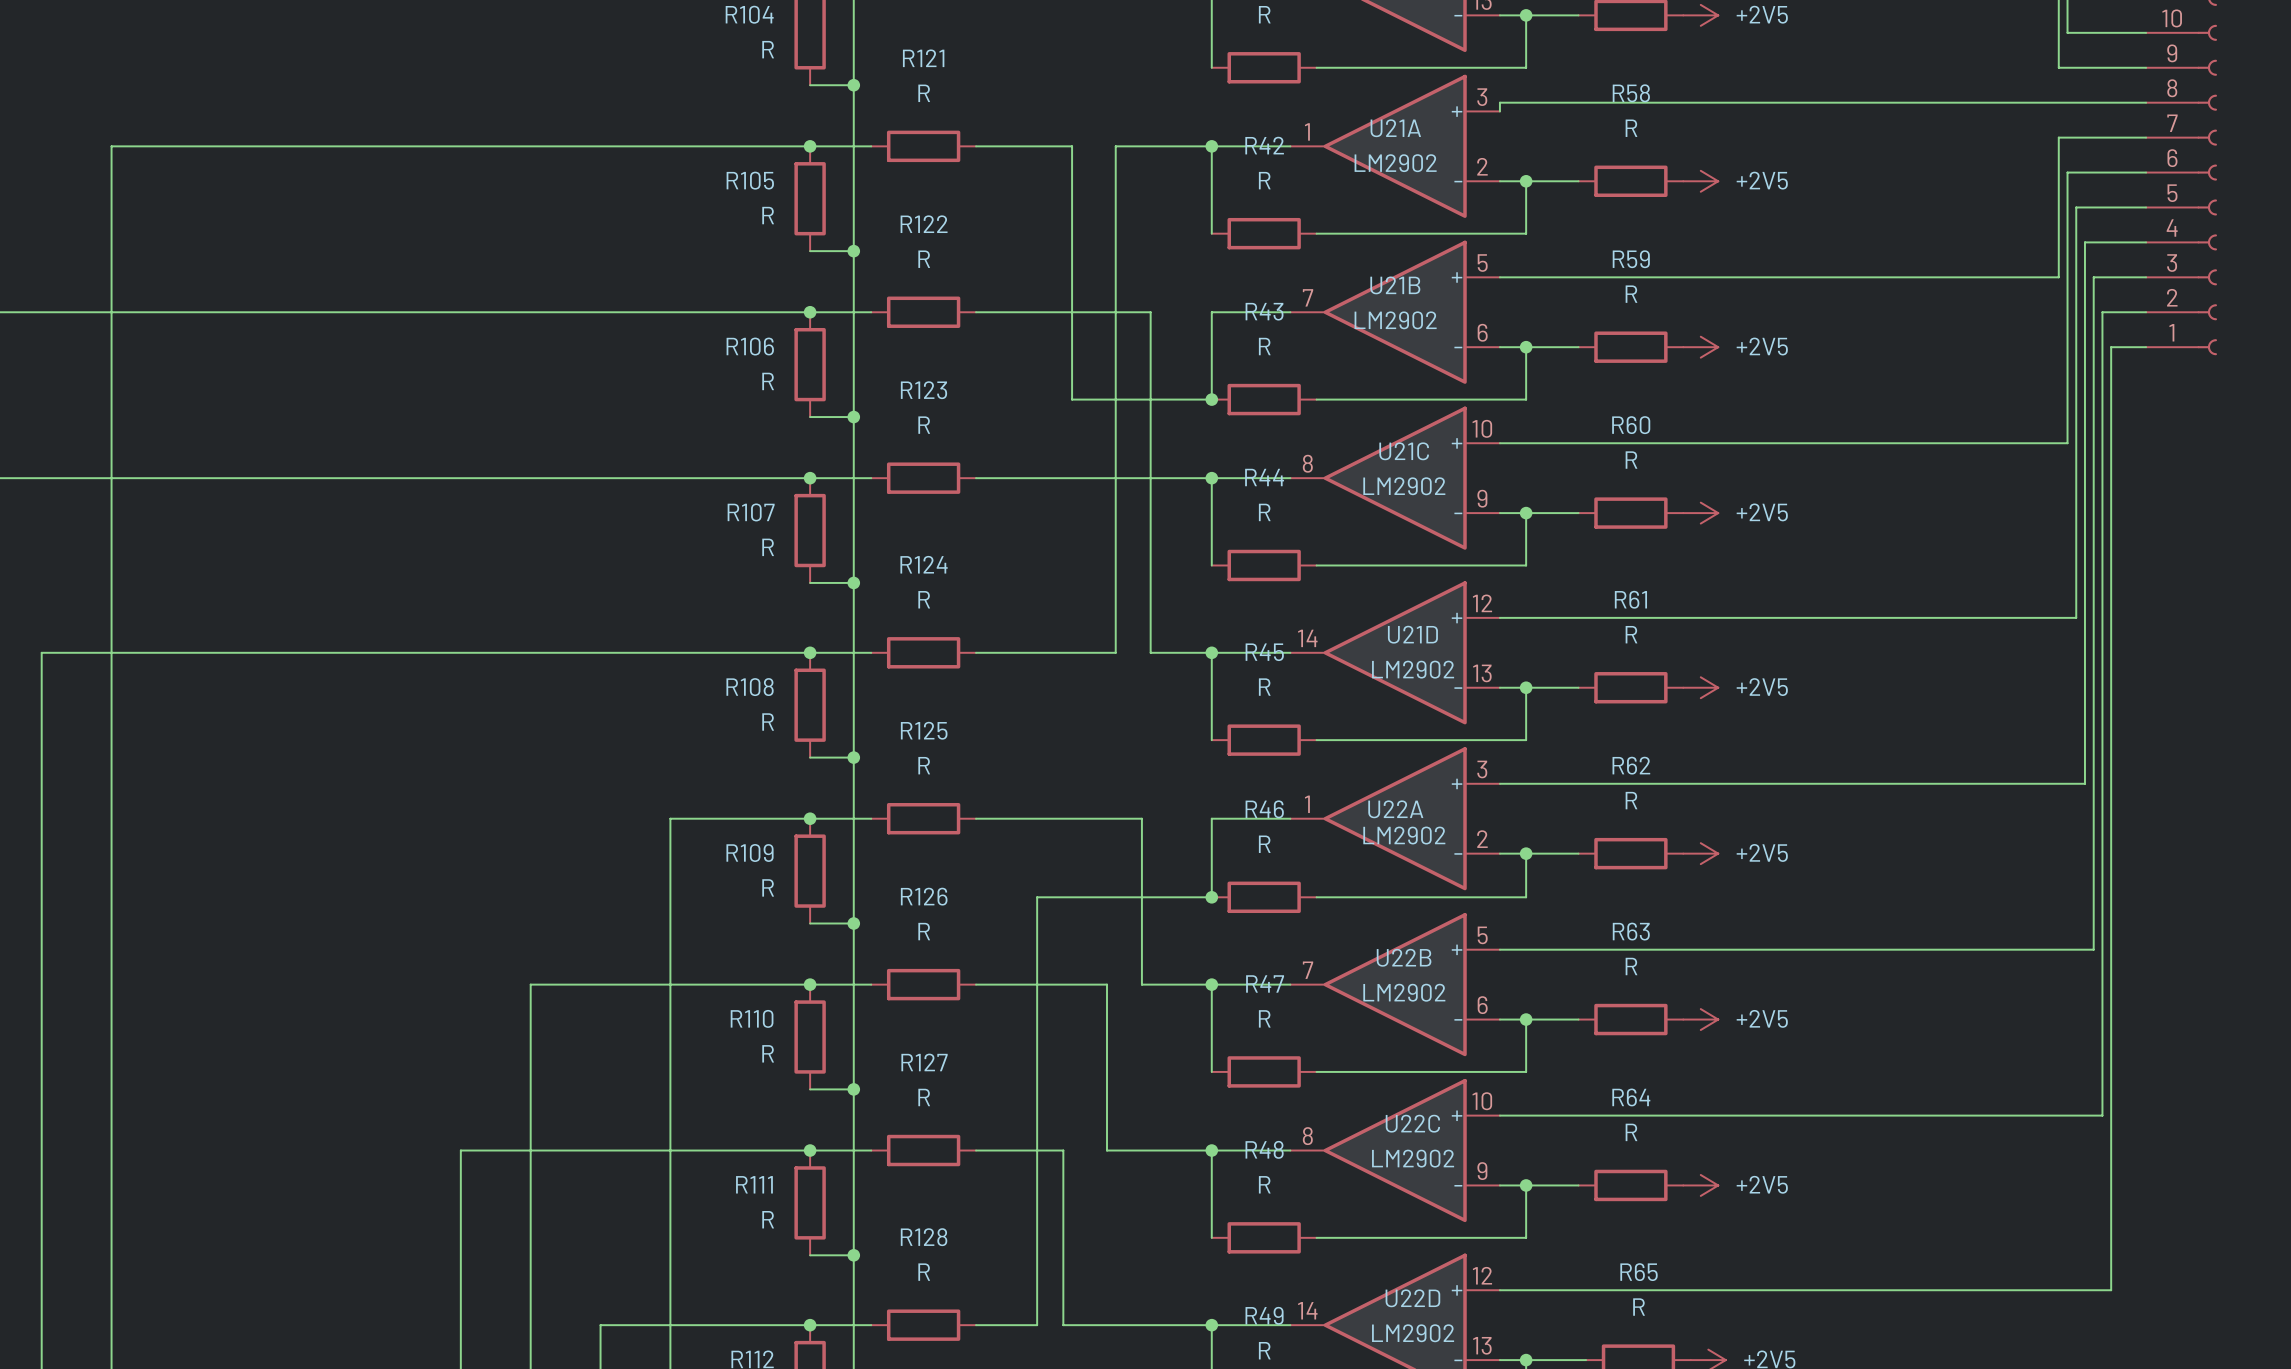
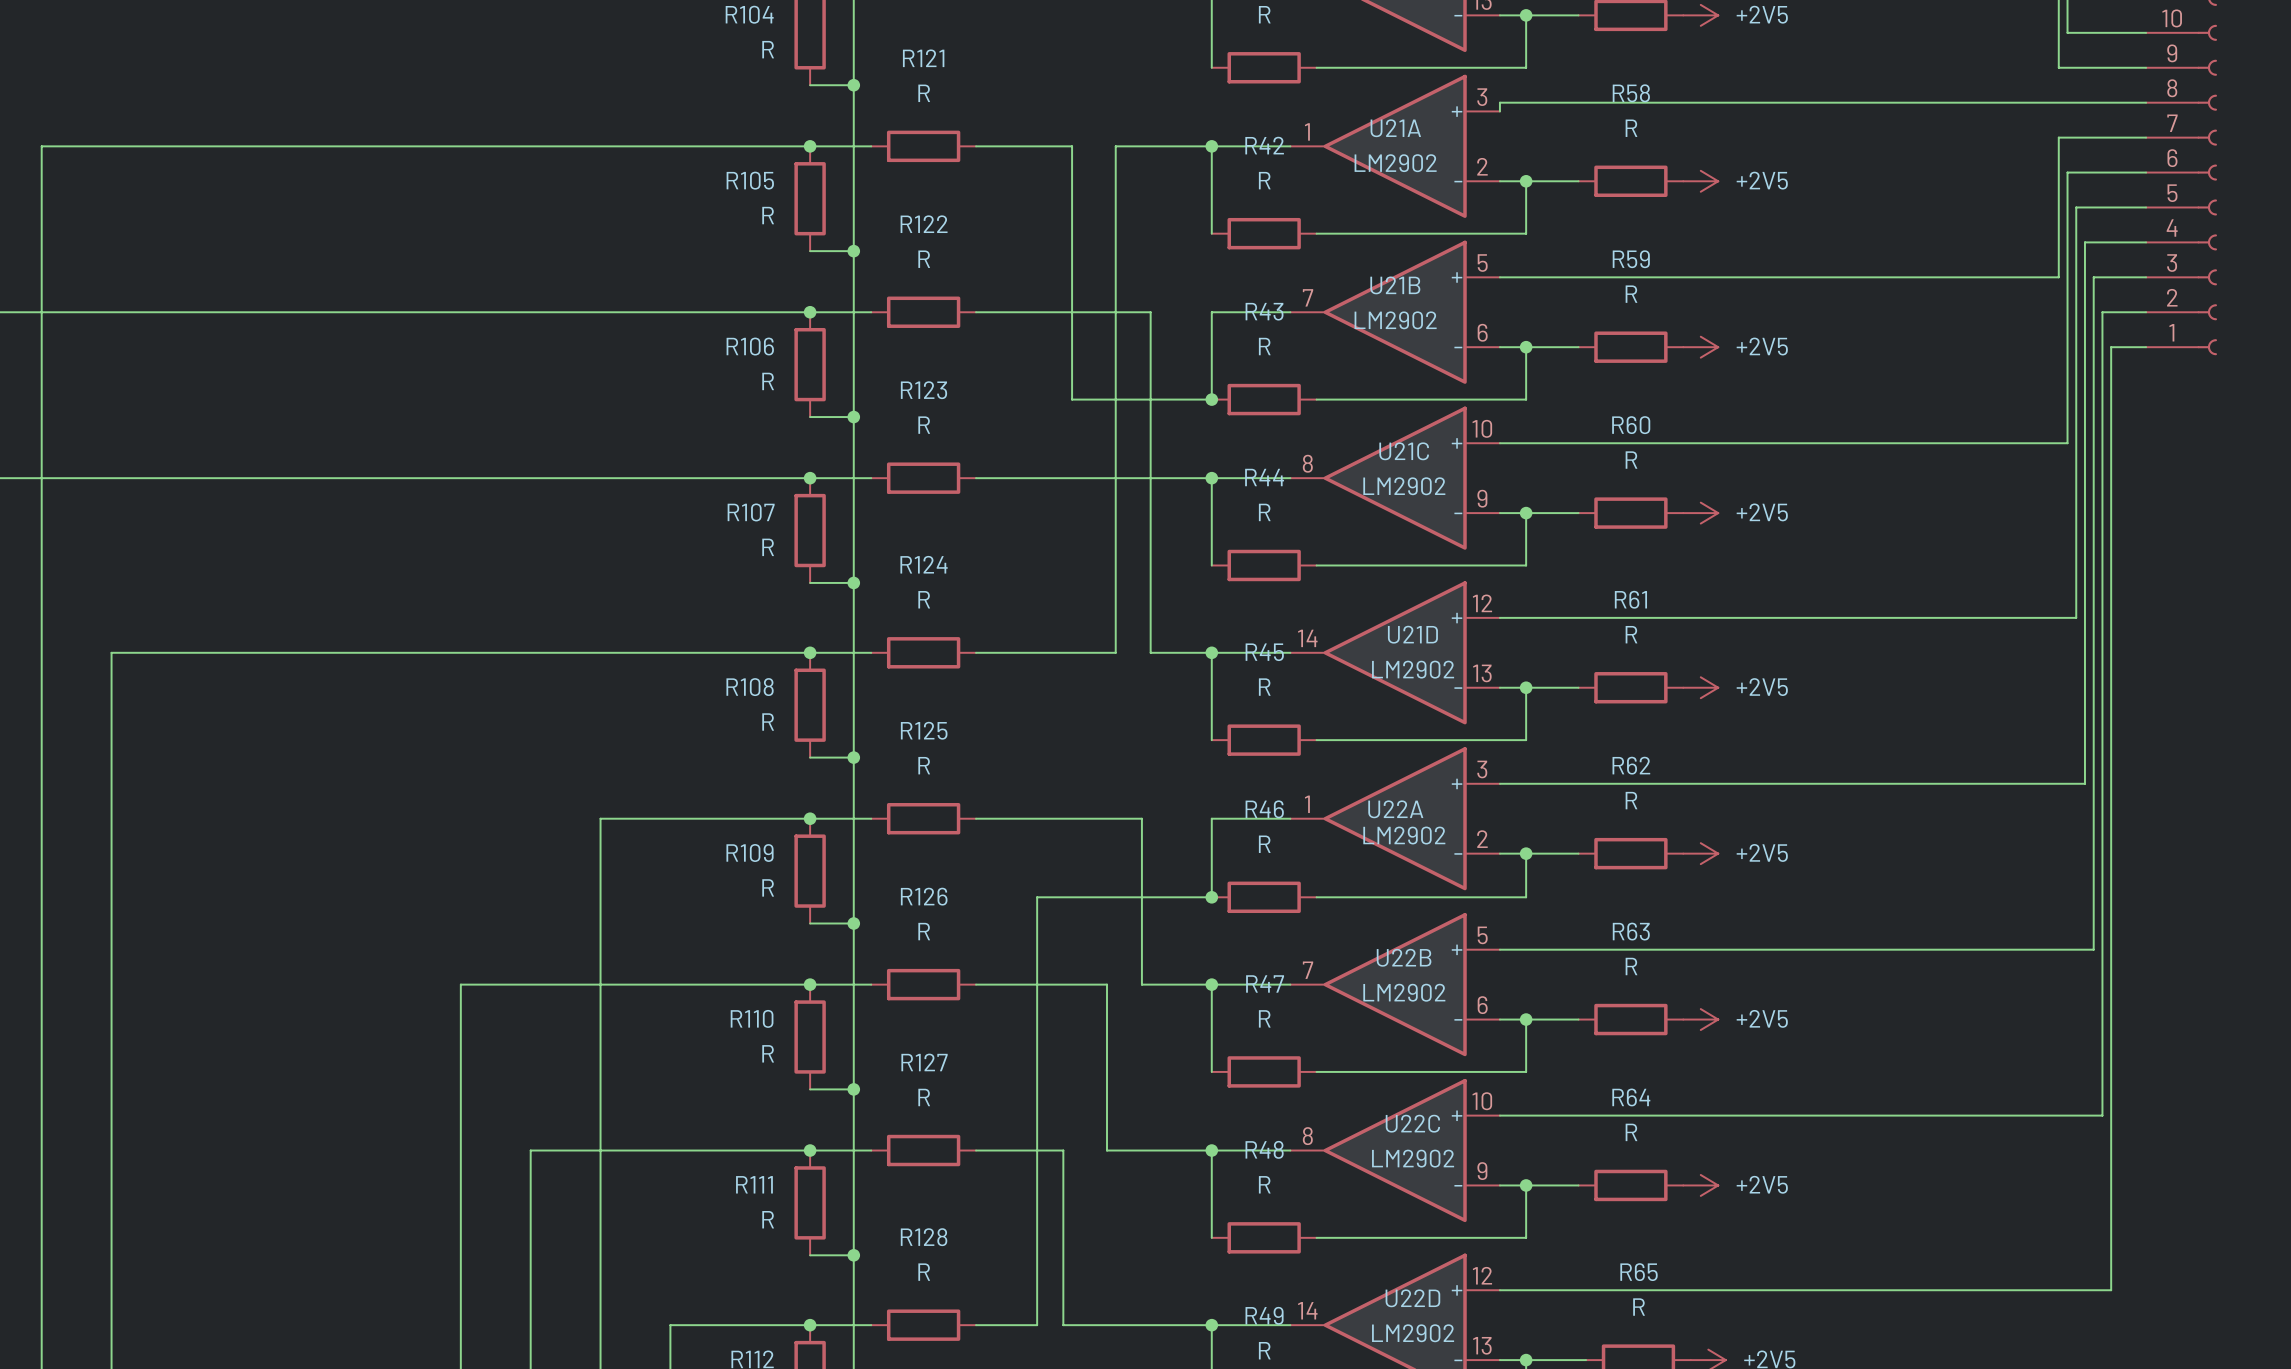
wire: (111, 146) (111, 652) (41, 652) -> (111, 146) (41, 146) (41, 652)
wire: (670, 818) (670, 1325) (600, 1325) -> (670, 818) (600, 818) (600, 1325)
wire: (530, 984) (530, 1150) (460, 1150) -> (530, 984) (460, 984) (460, 1150)

